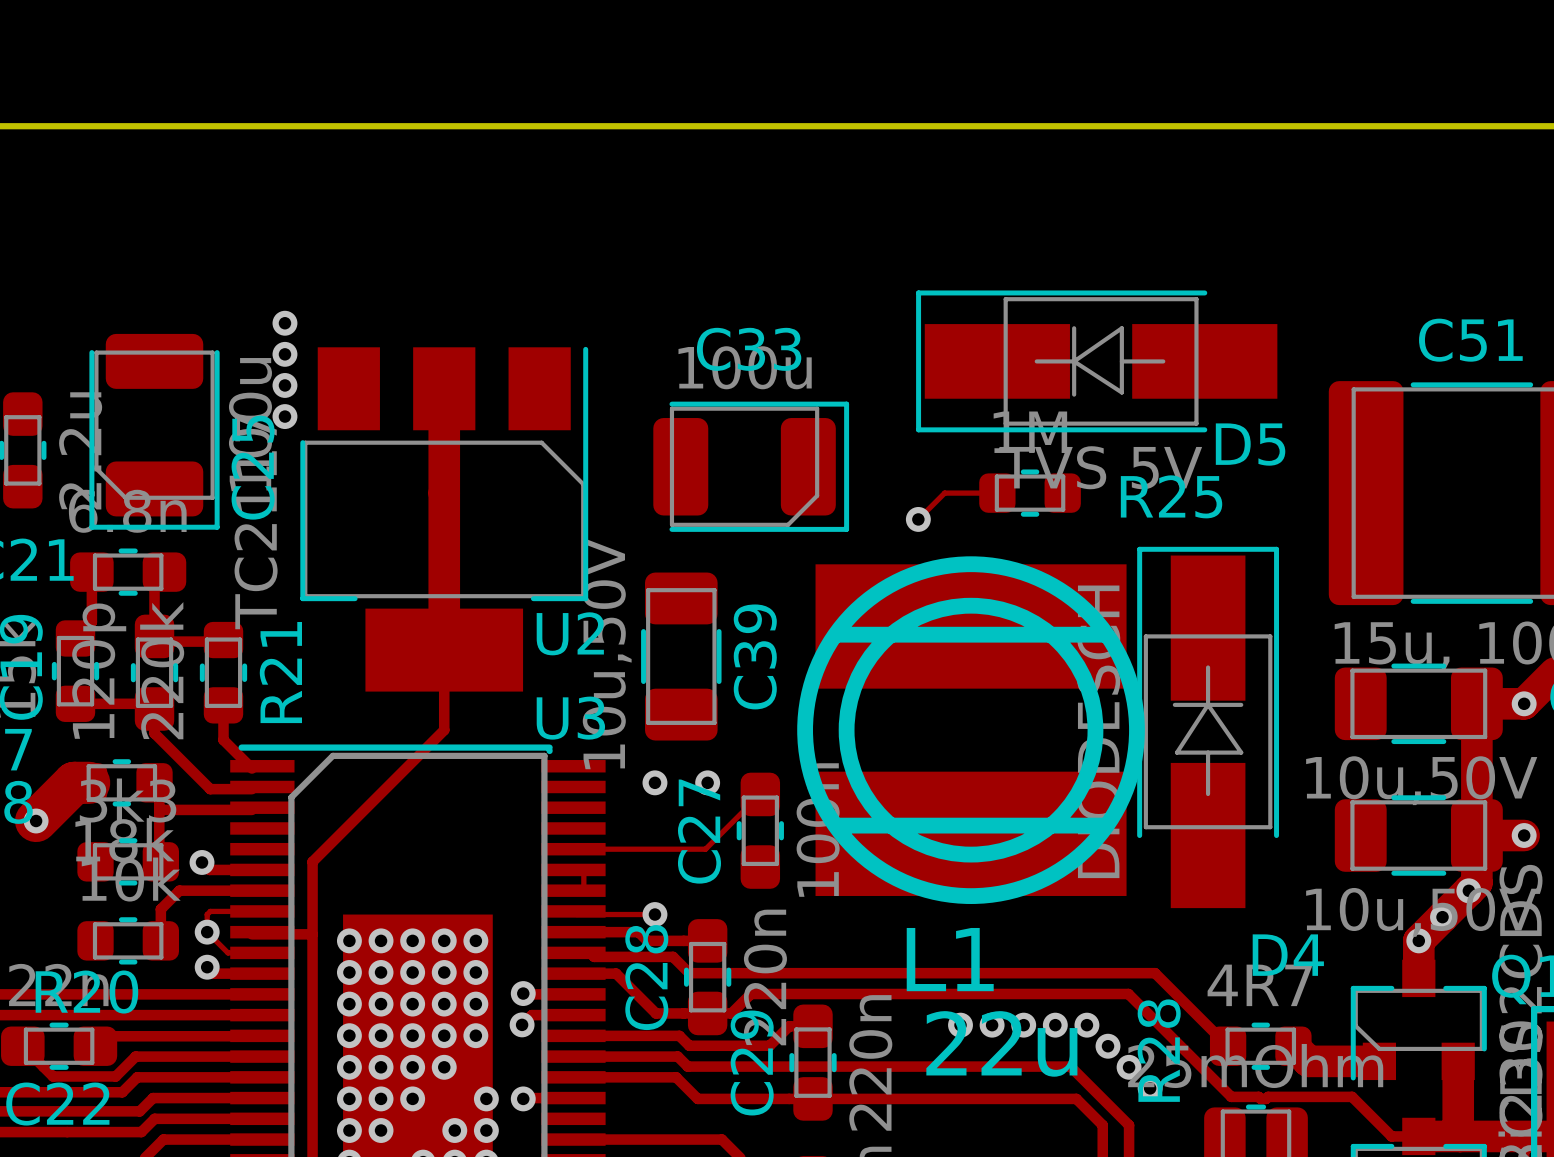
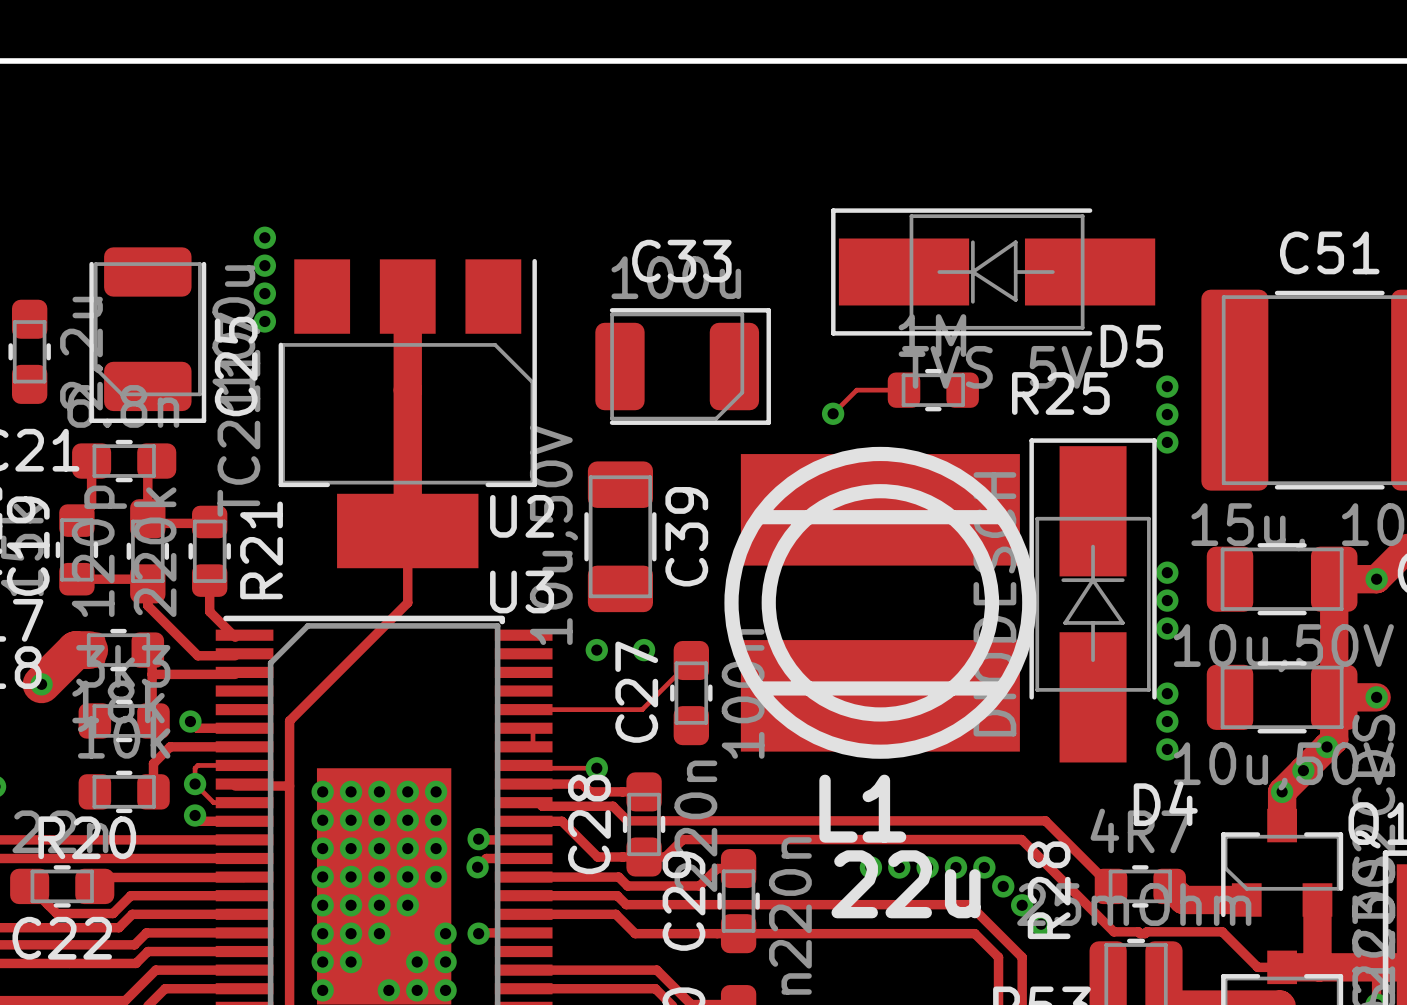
via: none -> (1167, 386)
via: none -> (1167, 414)
via: none -> (1167, 442)
via: none -> (1167, 572)
via: none -> (1167, 600)
via: none -> (1167, 628)
via: none -> (1167, 693)
via: none -> (1167, 721)
via: none -> (1167, 749)

